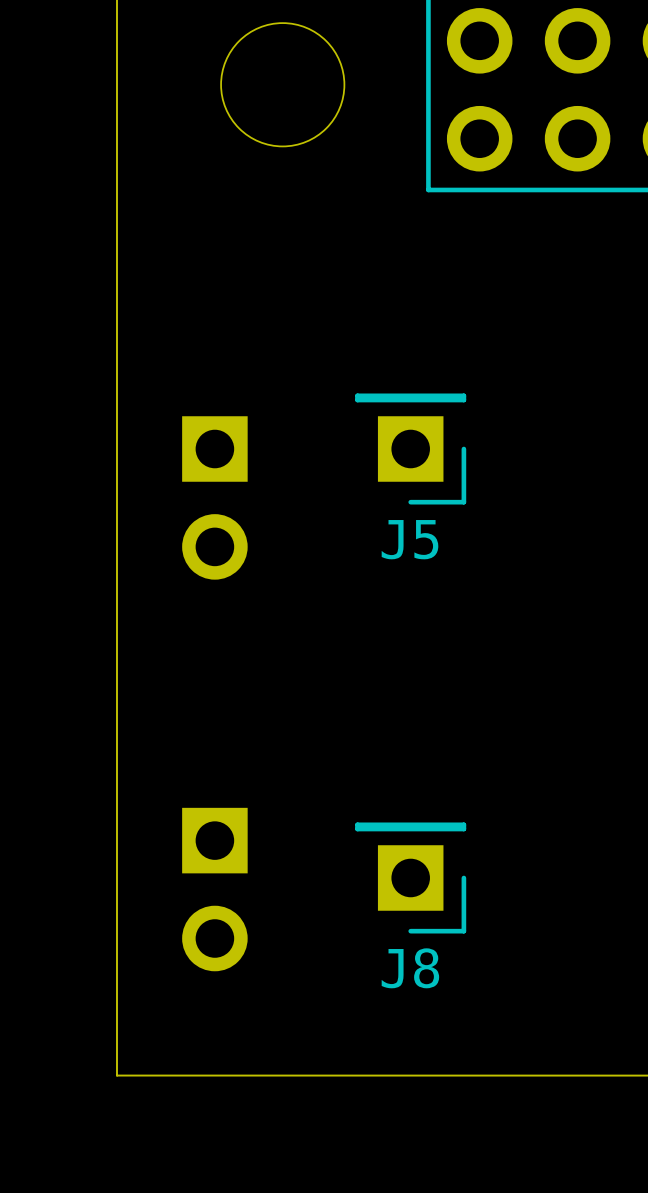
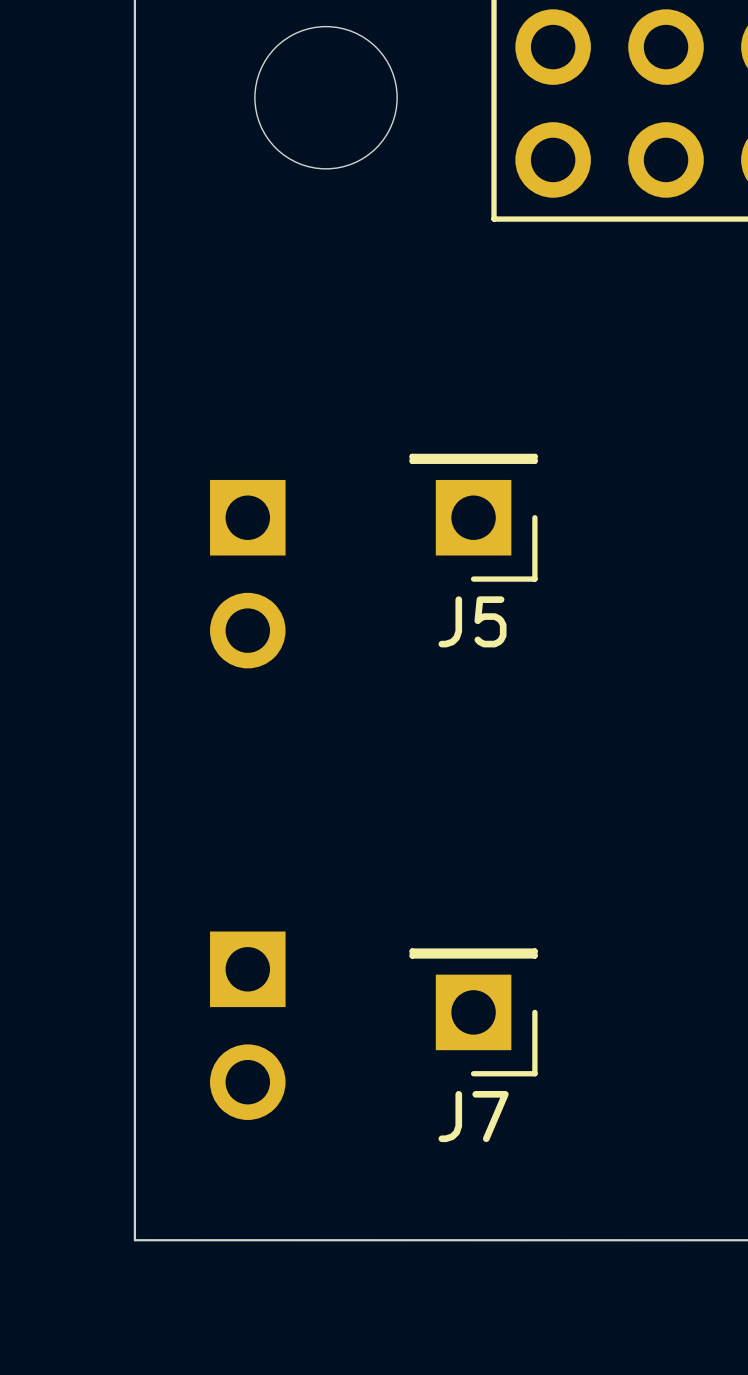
J8 name: J8 (410, 968) -> J7 (473, 1116)

